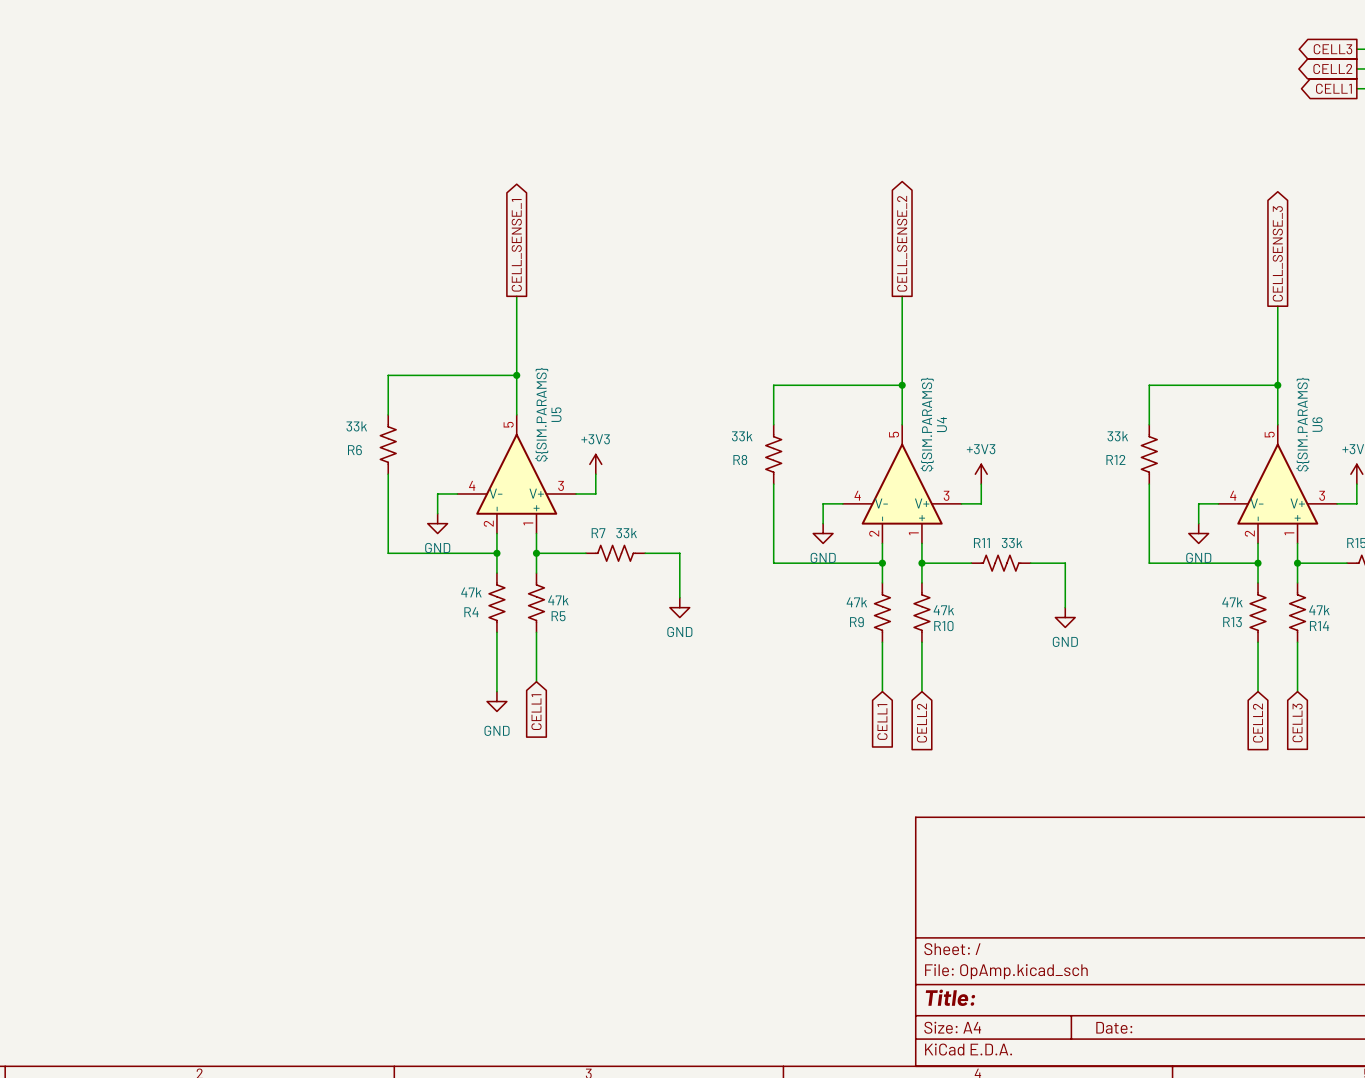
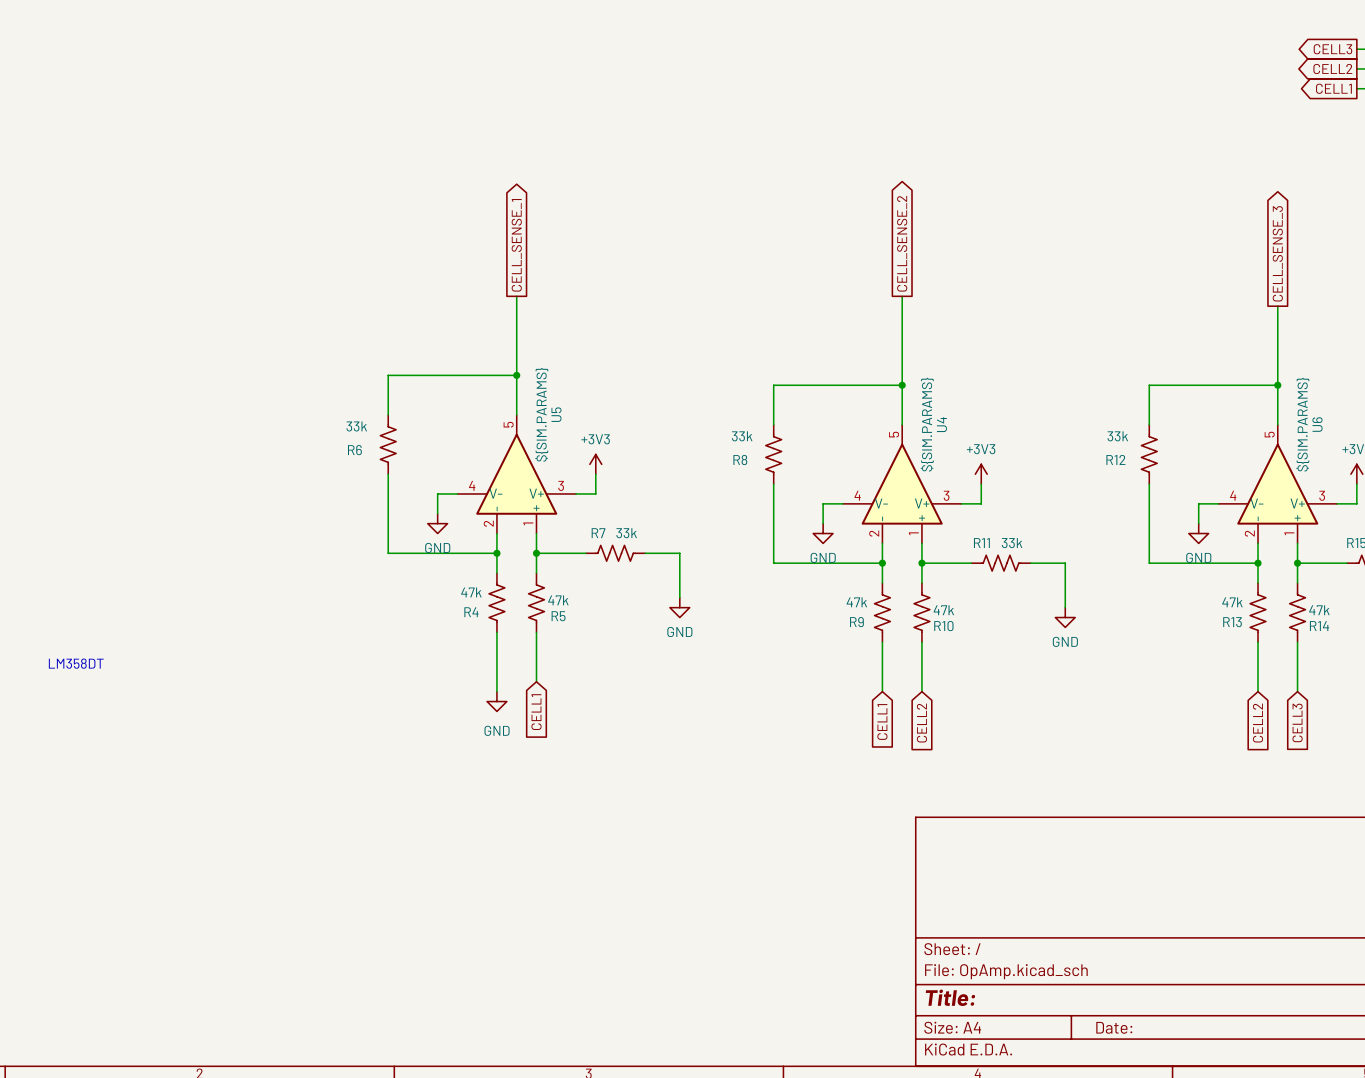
text: none -> LM358DT (76, 663)

